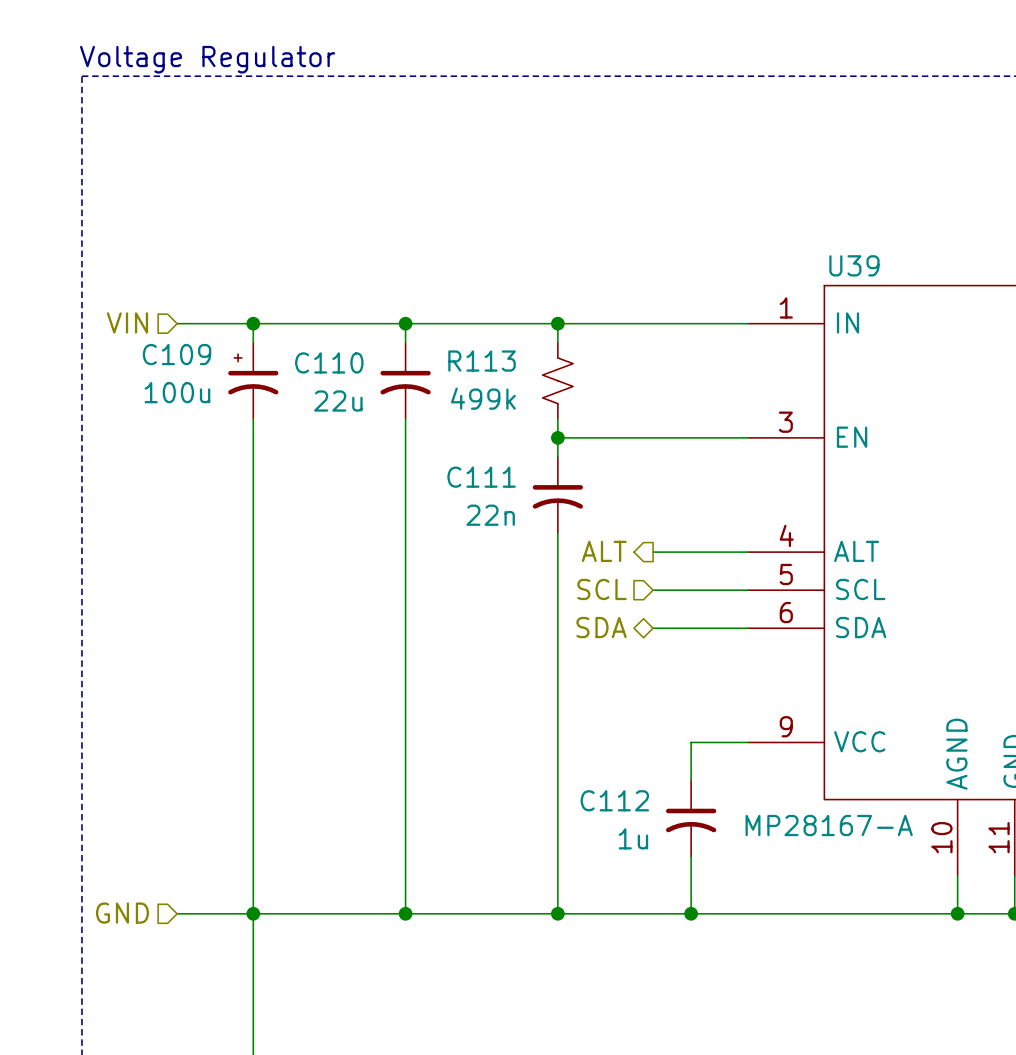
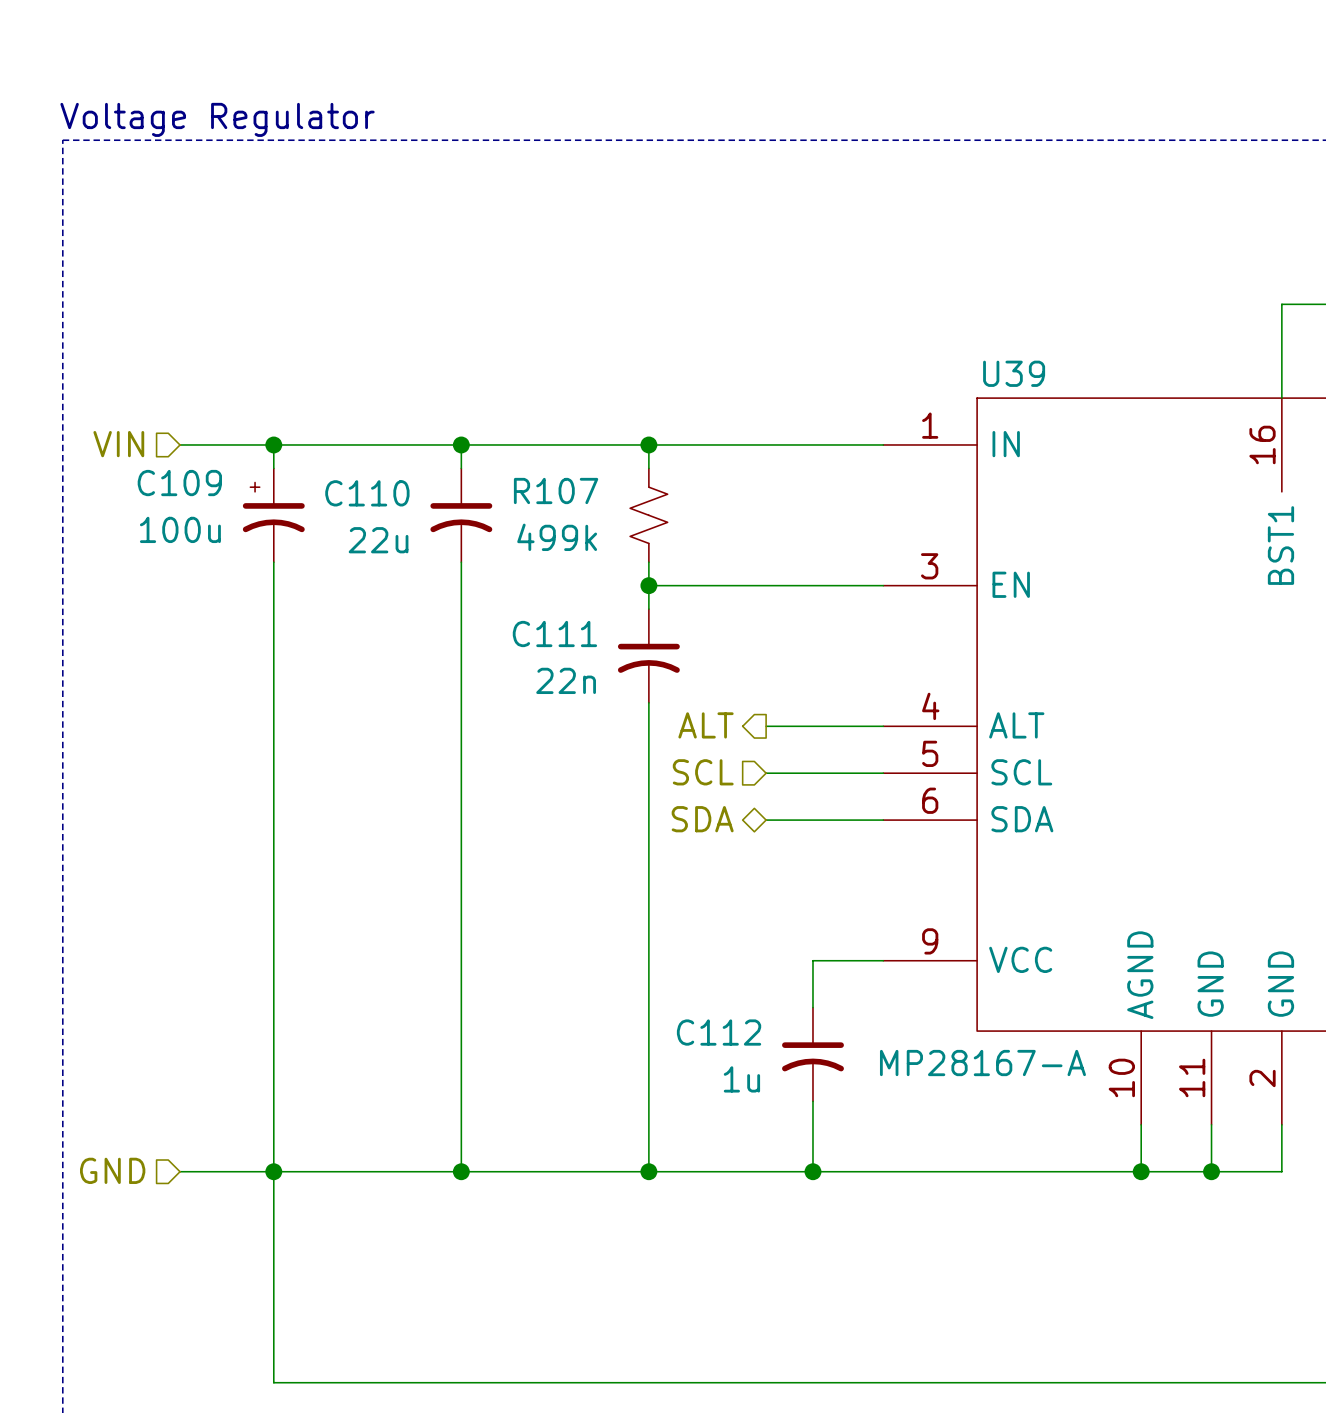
R113 name: R113 (482, 361) -> R107 (556, 490)

